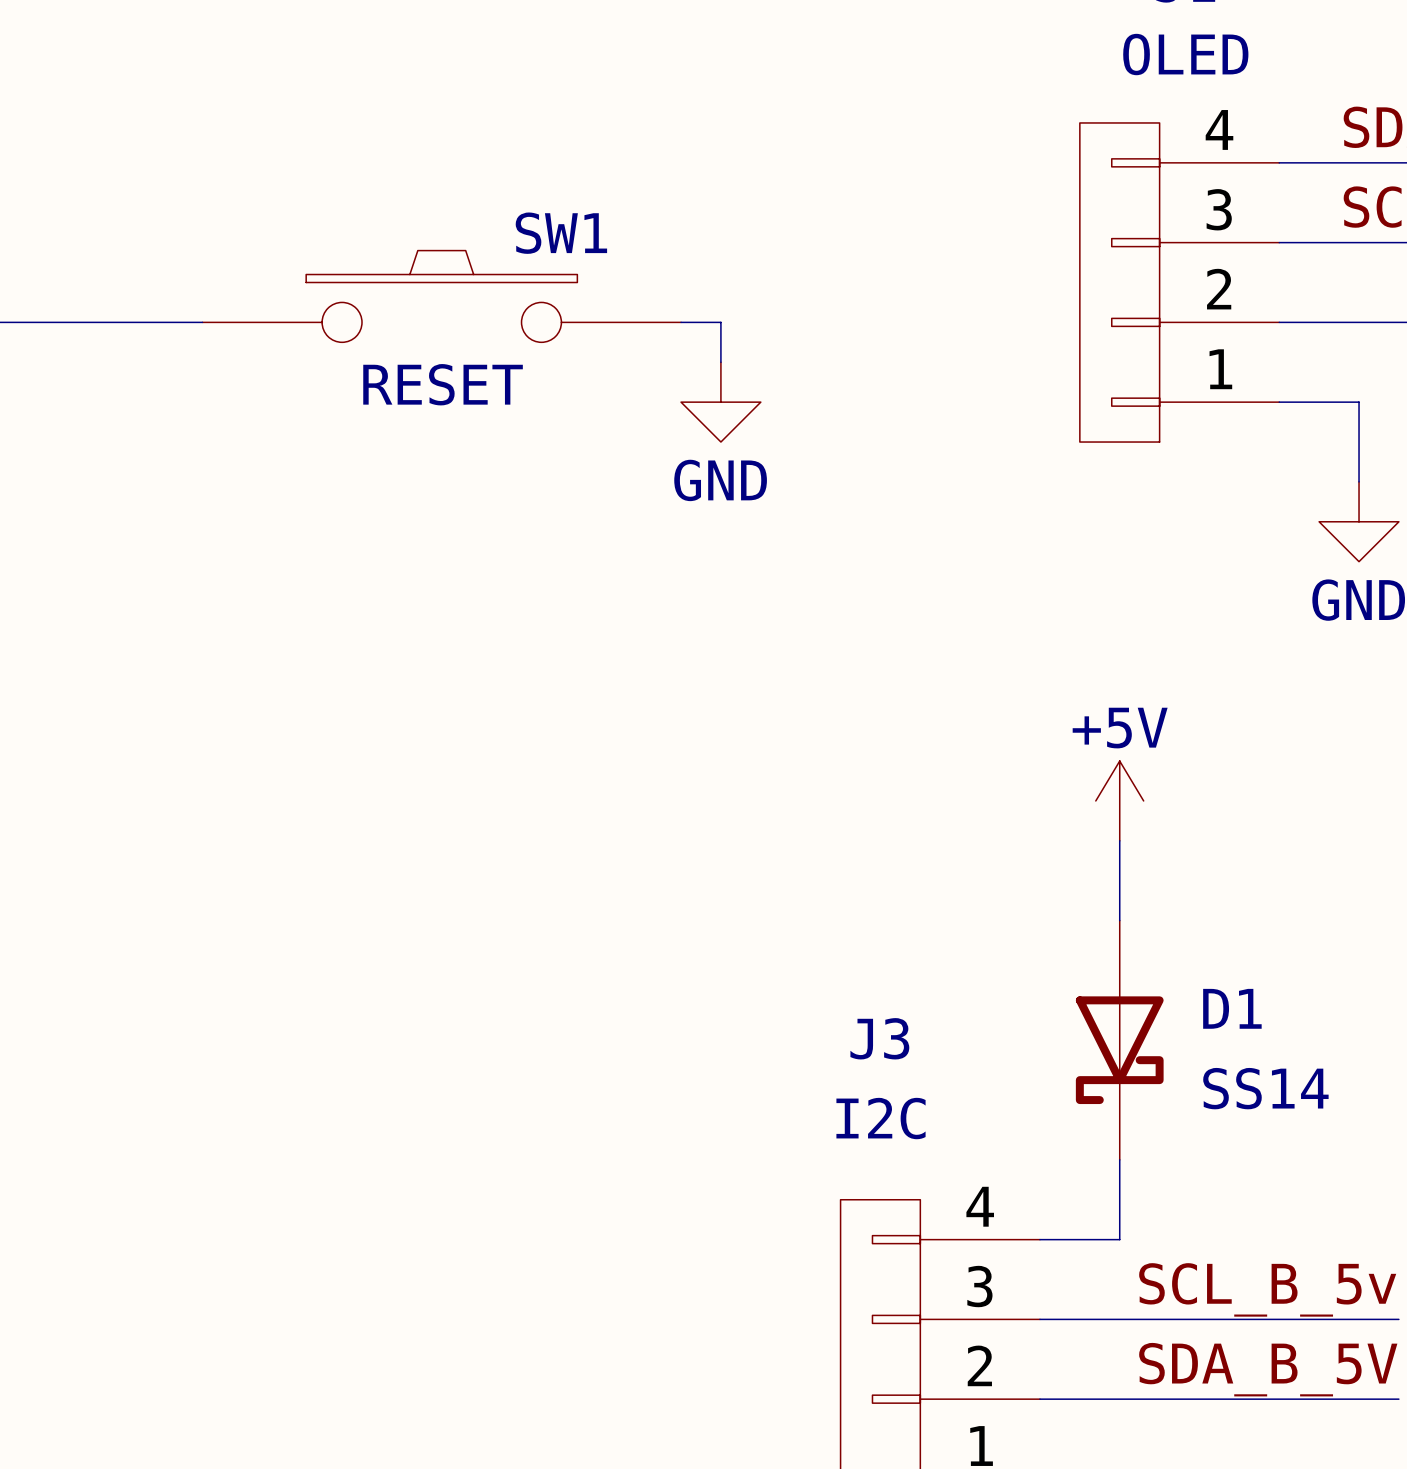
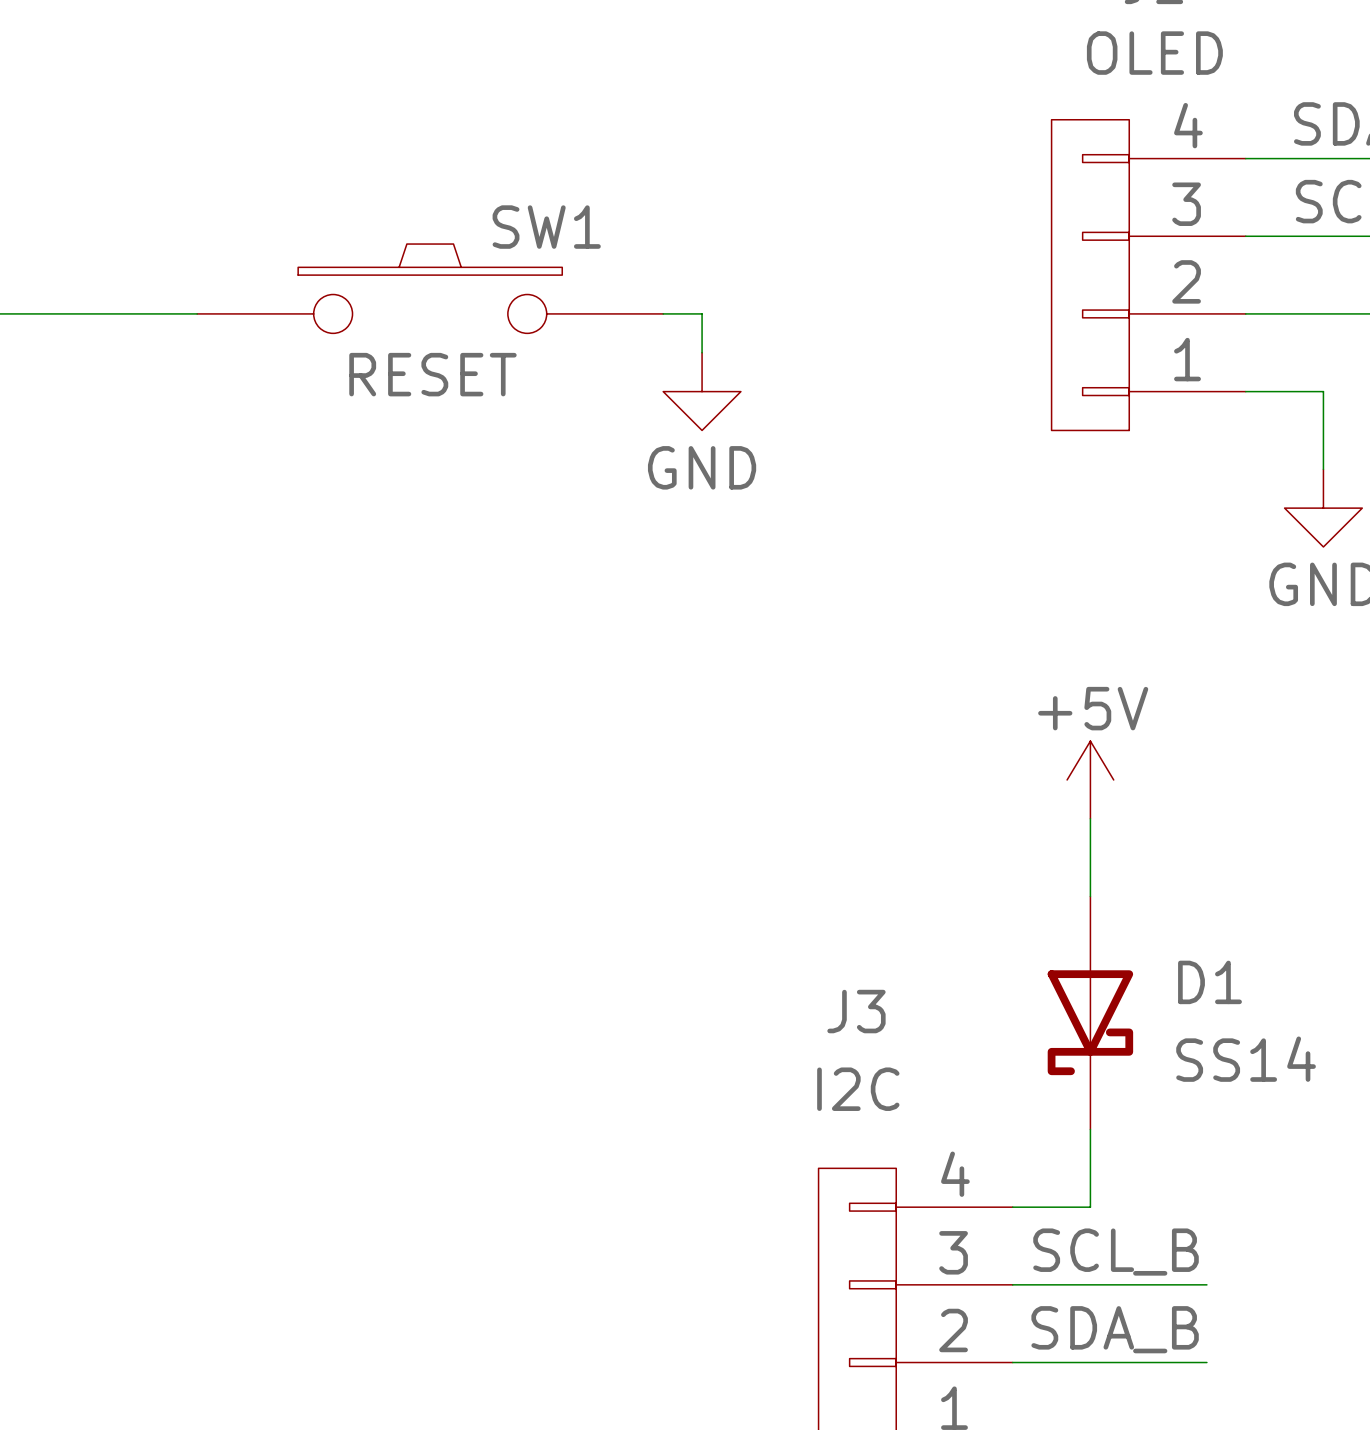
label: SCL_B_5v (1267, 1289) -> SCL_B (1116, 1252)
wire: (1239, 1319) (1398, 1319) -> none
label: SDA_B_5V (1268, 1369) -> SDA_B (1115, 1329)
wire: (1239, 1399) (1398, 1399) -> none

